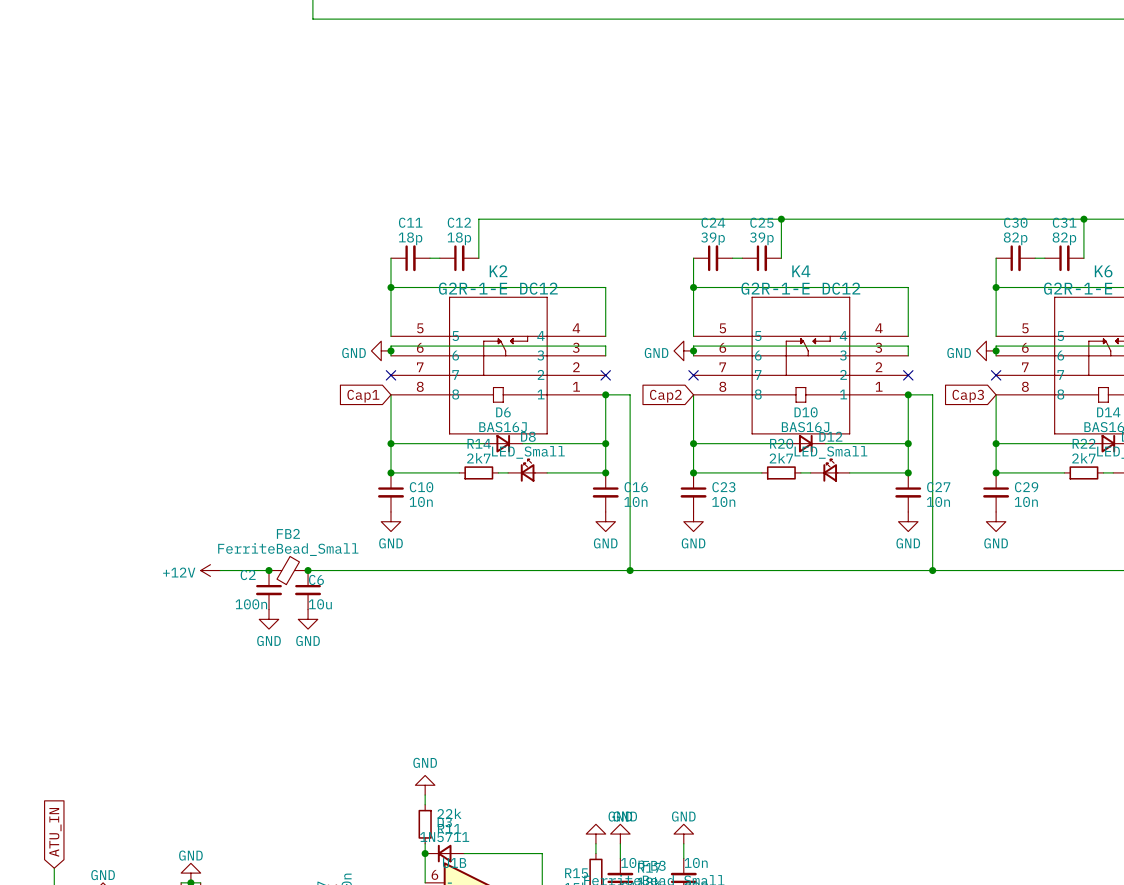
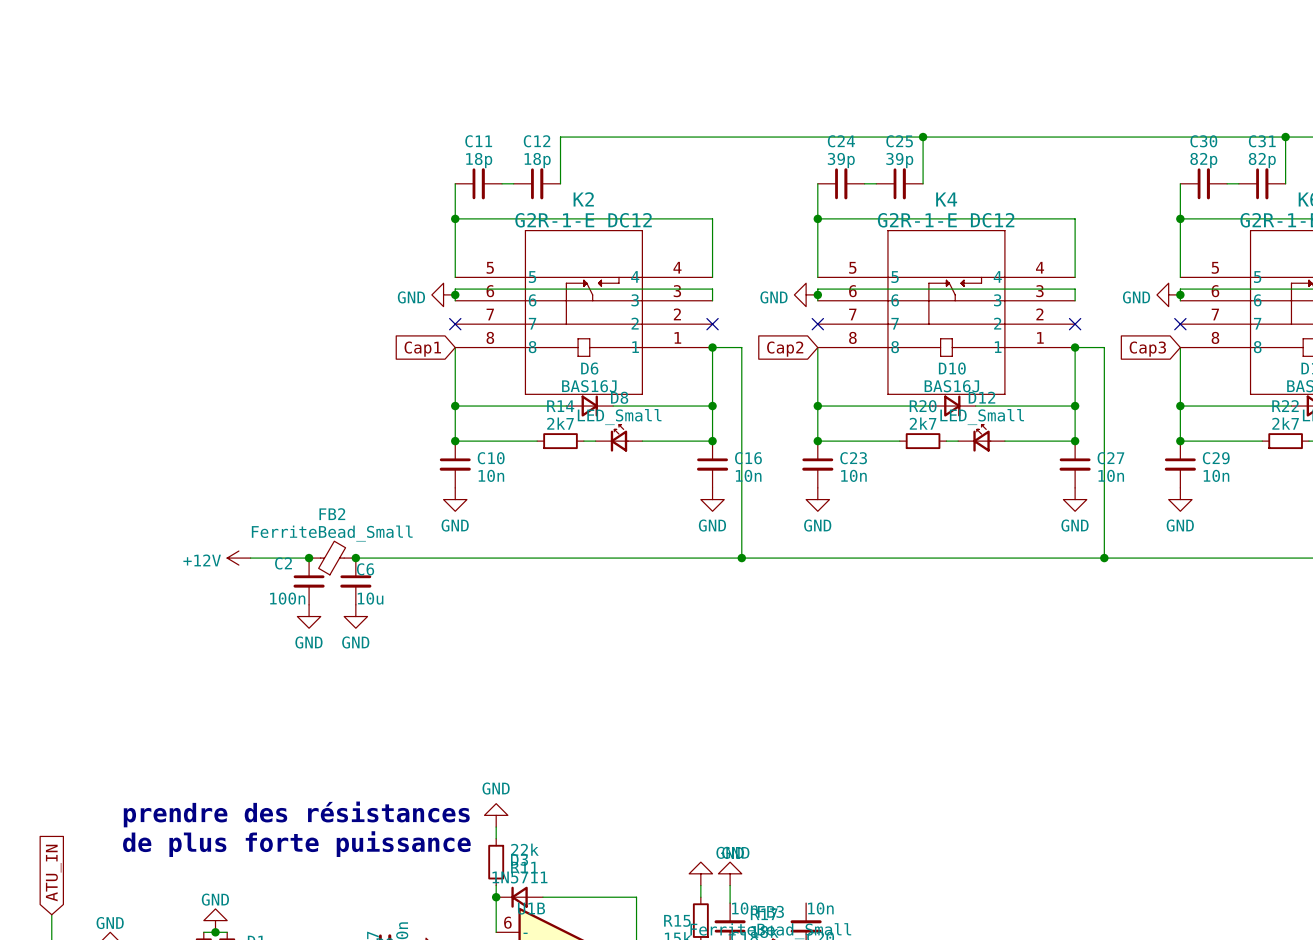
text: none -> prendre des résistances (296, 814)
text: none -> de plus forte puissance (296, 844)
power symbol: GND (683, 834) -> none
wire: (683, 843) (683, 858) -> none

